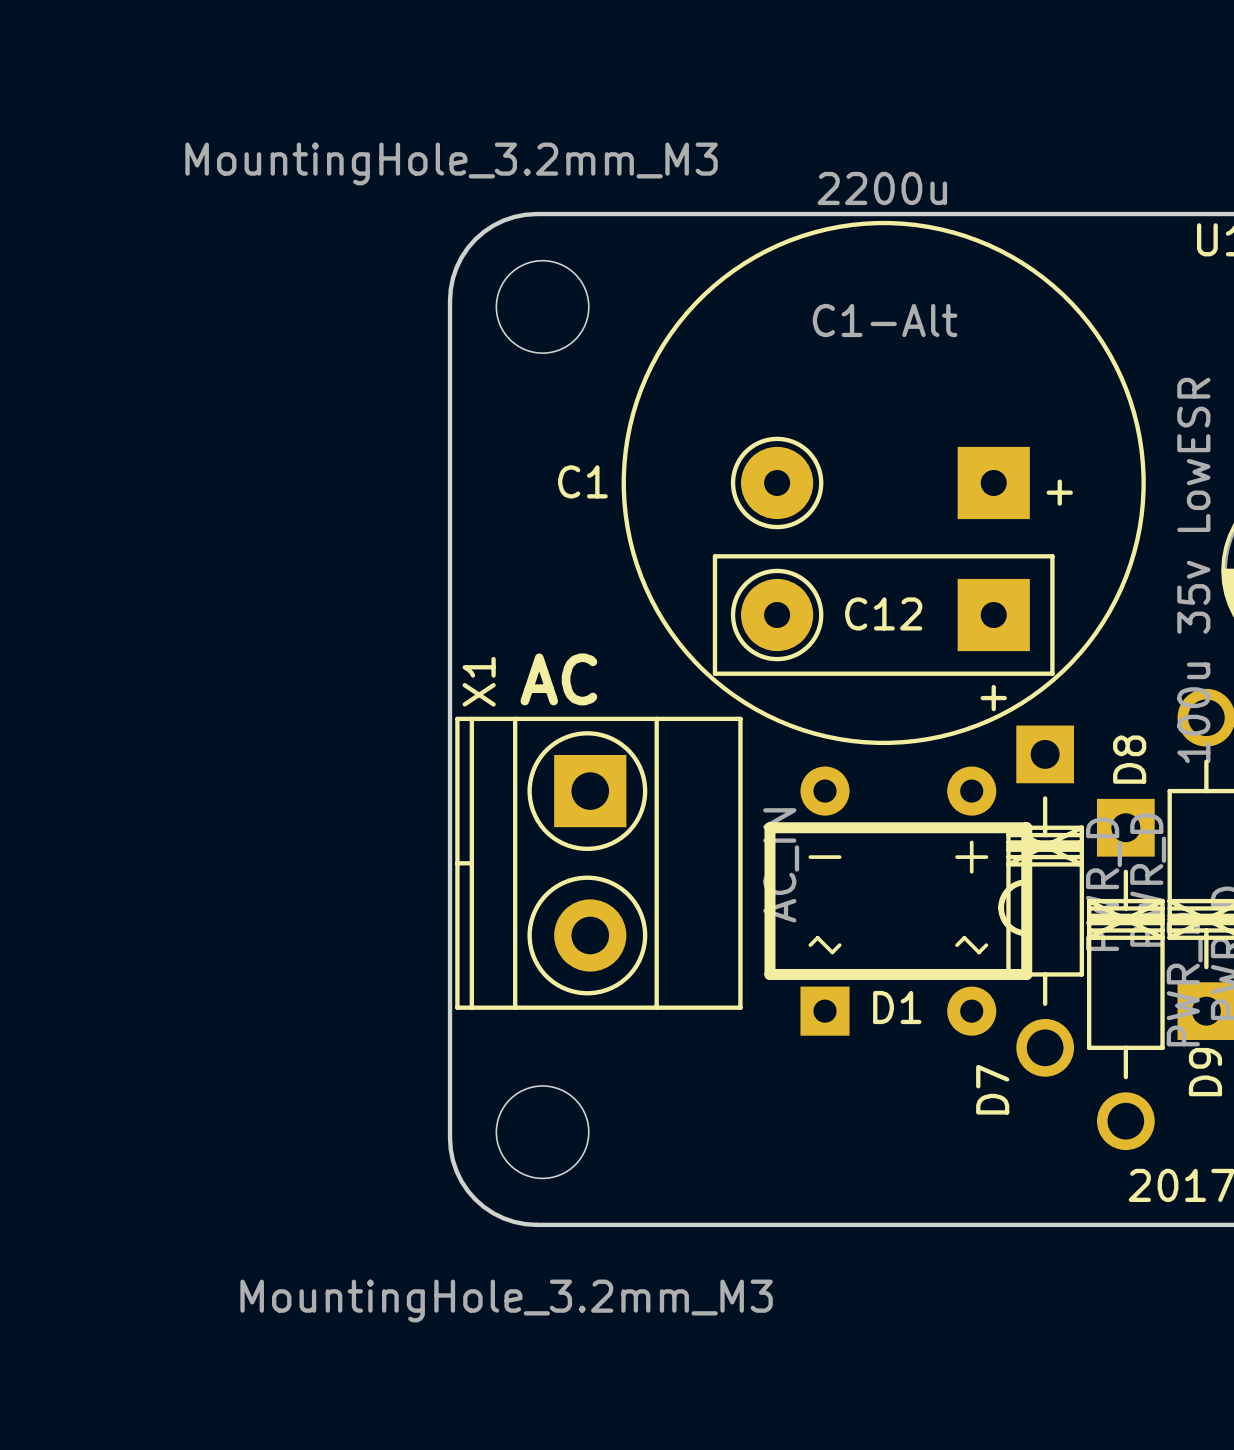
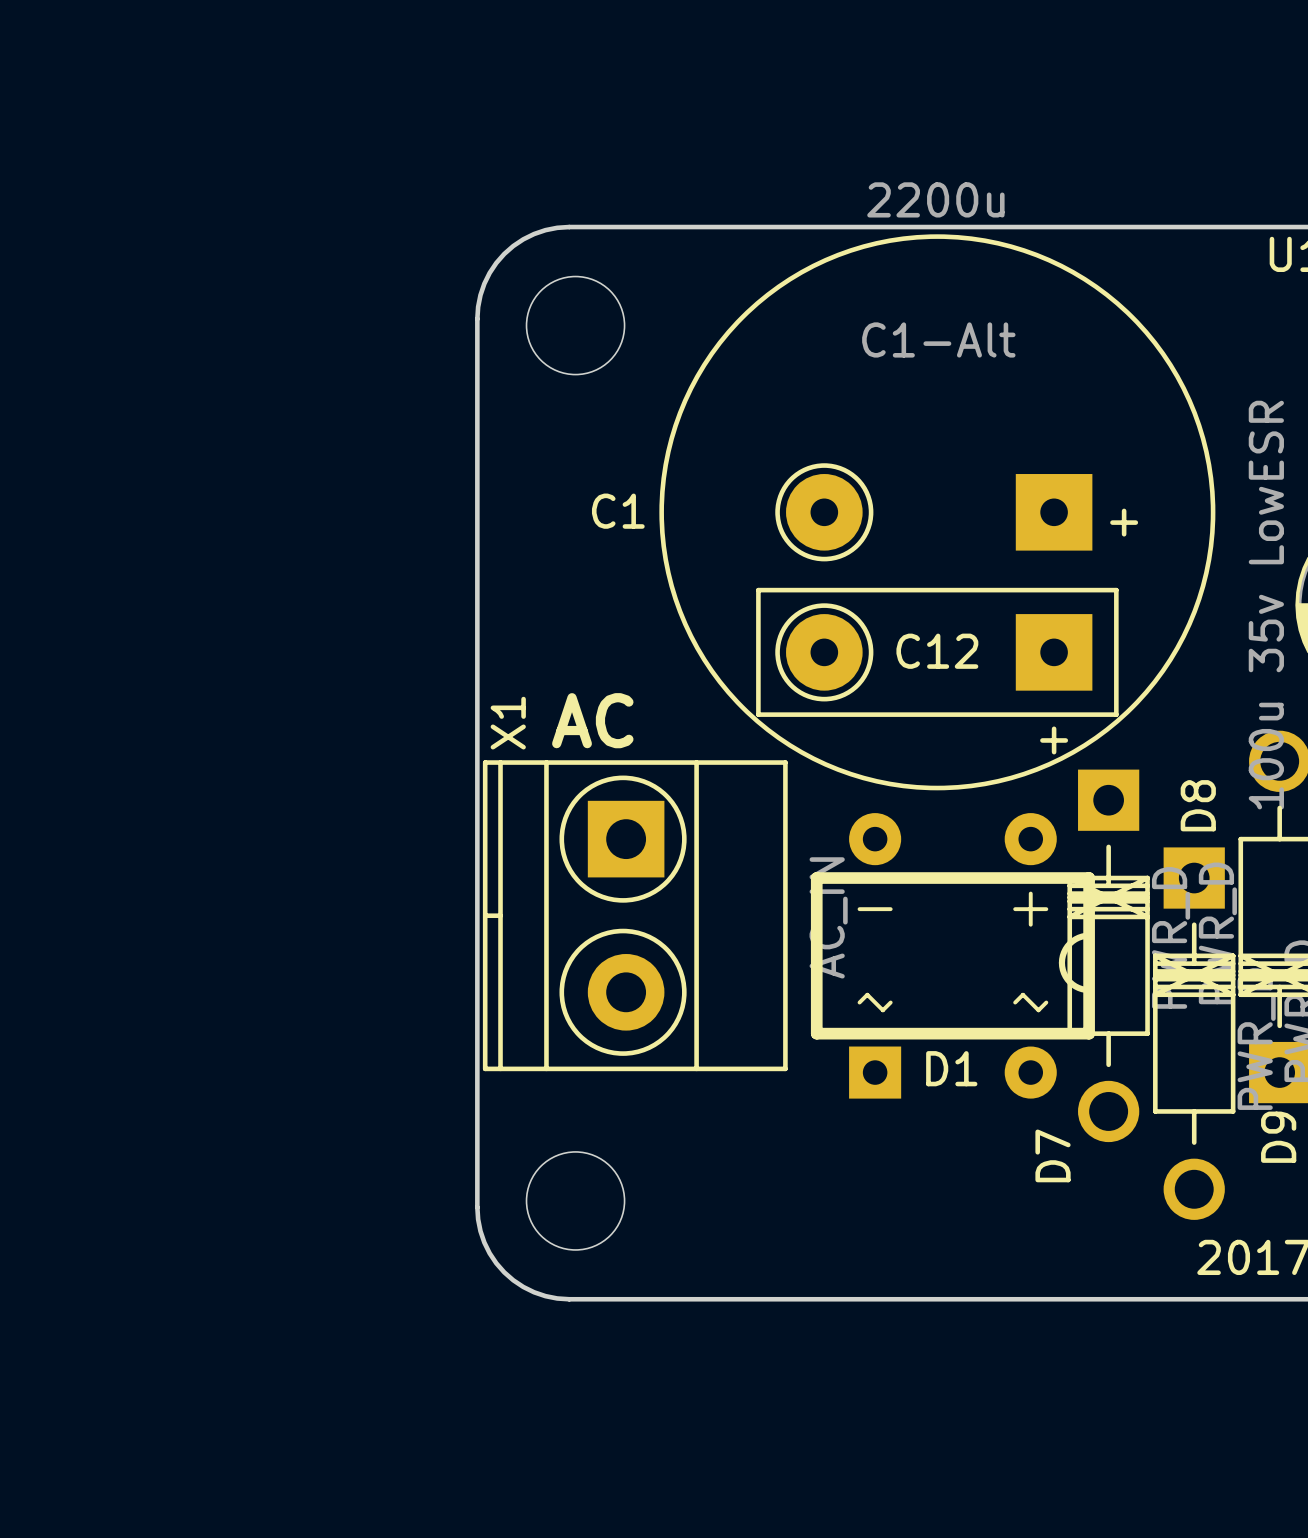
part value: MountingHole_3.2mm_M3 (451, 163) -> none
part value: MountingHole_3.2mm_M3 (506, 1300) -> none

